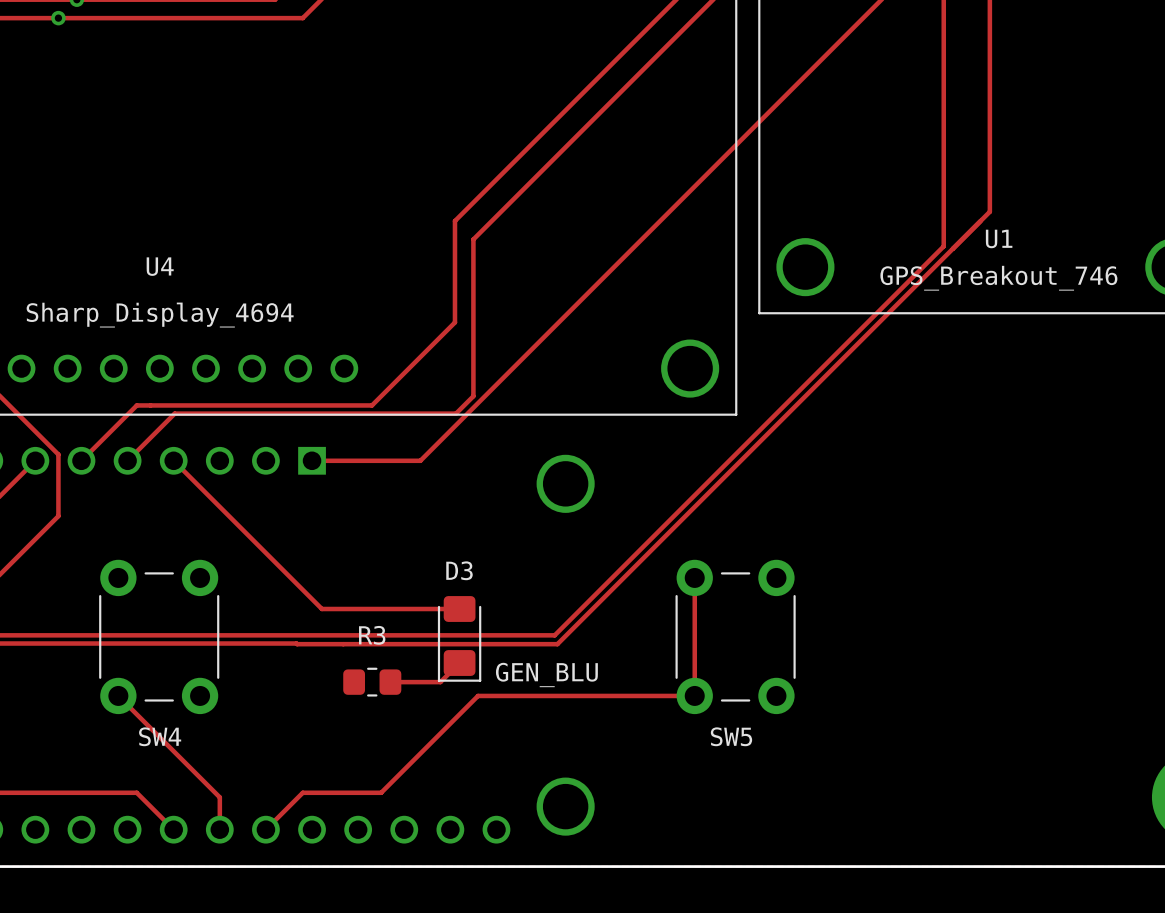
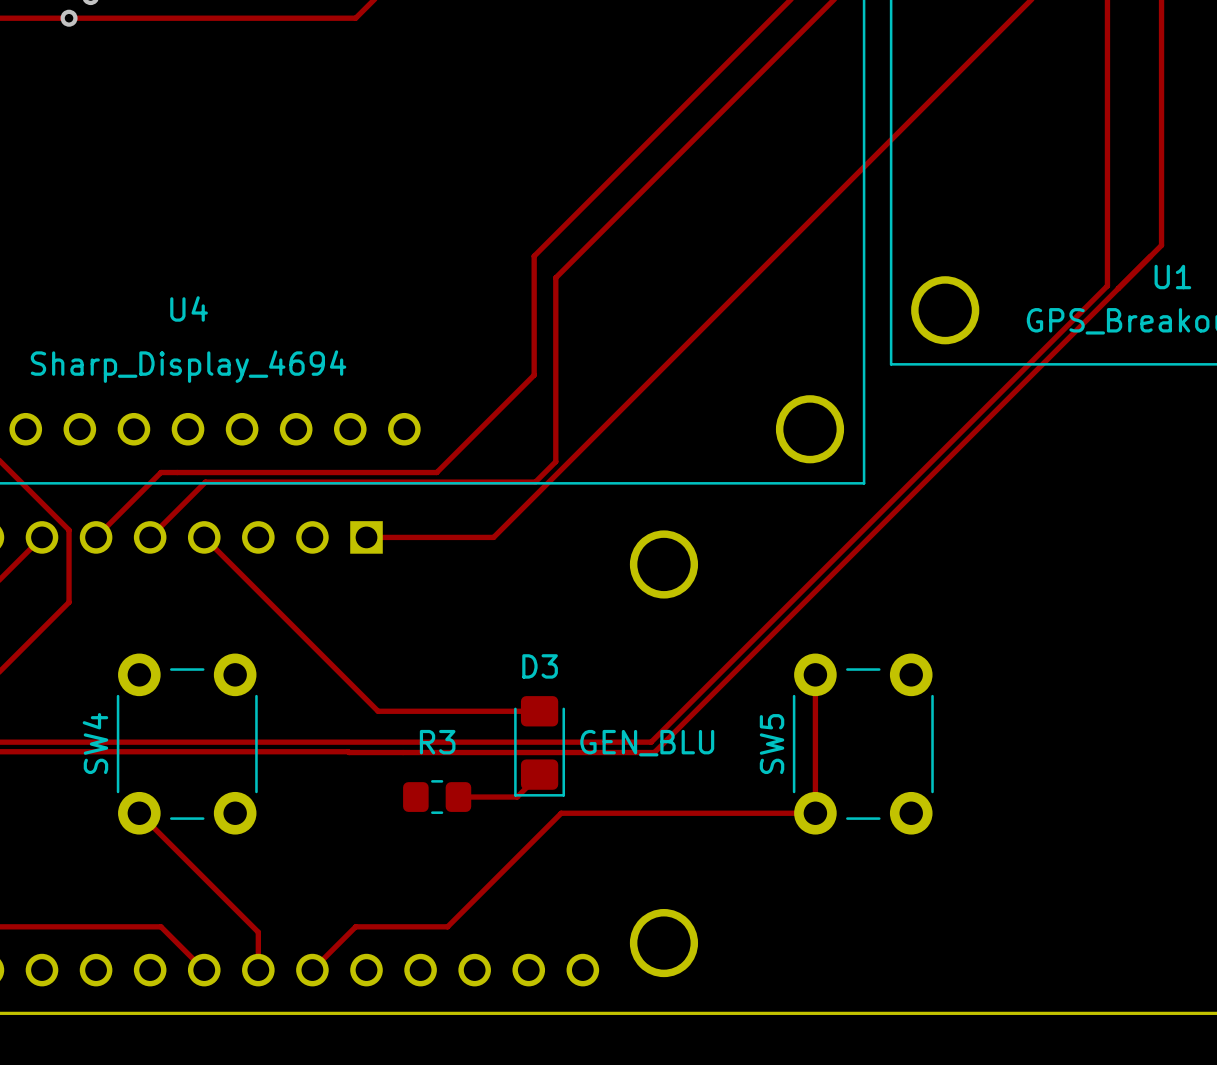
D3 value position: GEN_BLU (546, 674) -> GEN_BLU (647, 743)
SW4 name rotation: 0° (160, 736) -> 90° counterclockwise (95, 743)
SW4 name position: SW4 (160, 736) -> SW4 (95, 743)
SW5 name rotation: 0° (731, 736) -> 90° counterclockwise (772, 744)
SW5 name position: SW5 (731, 736) -> SW5 (772, 744)

